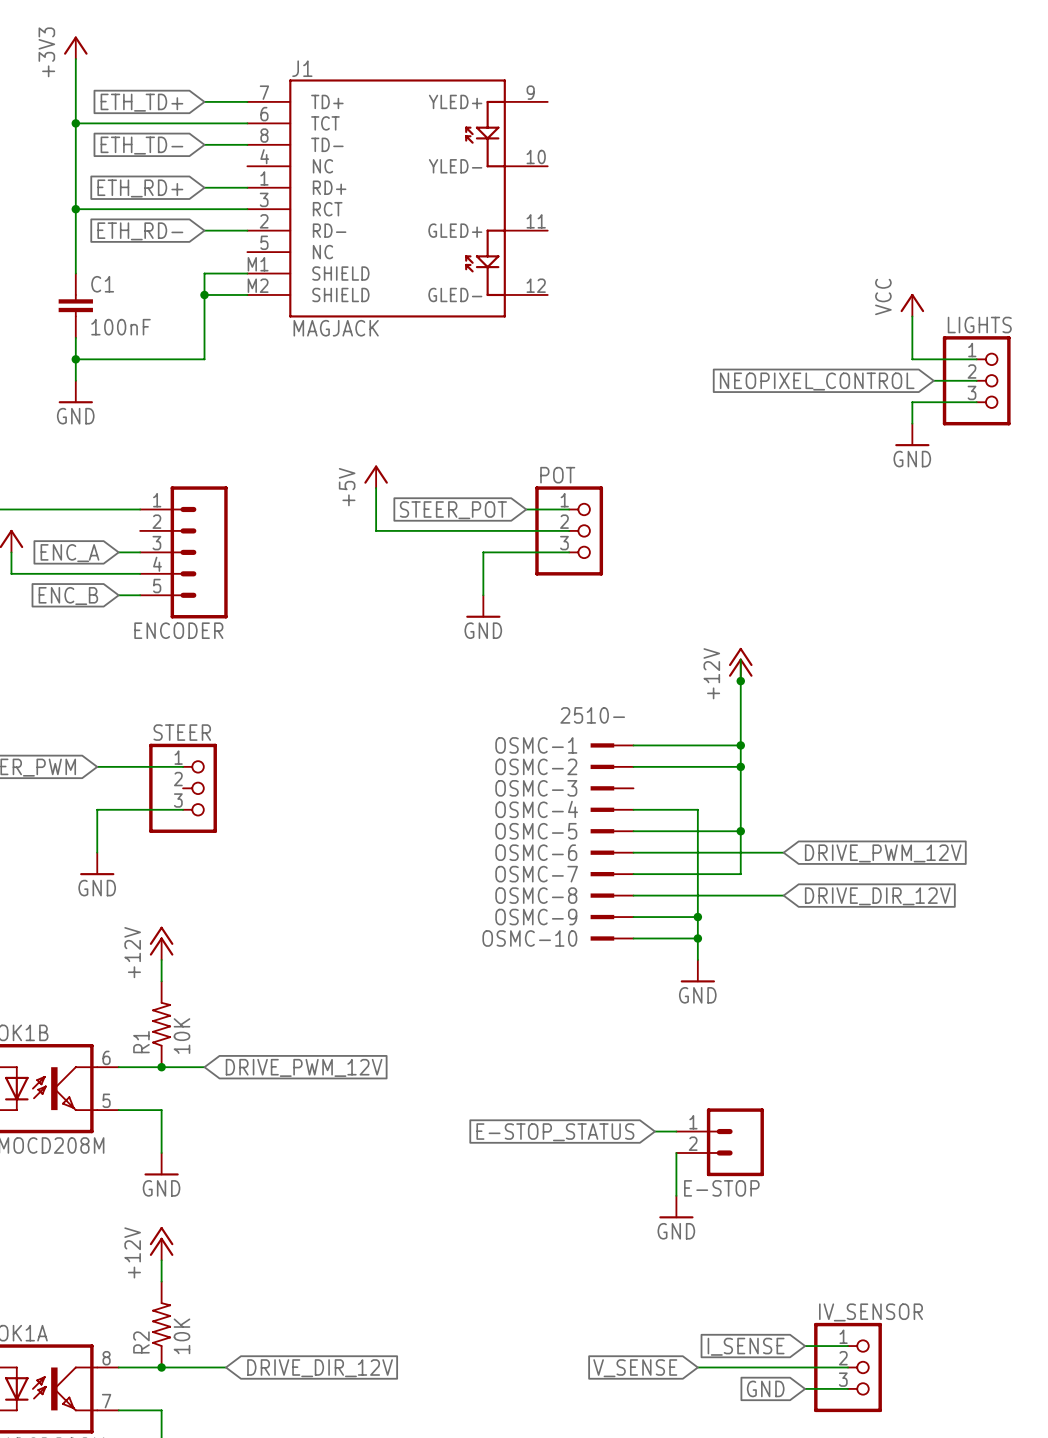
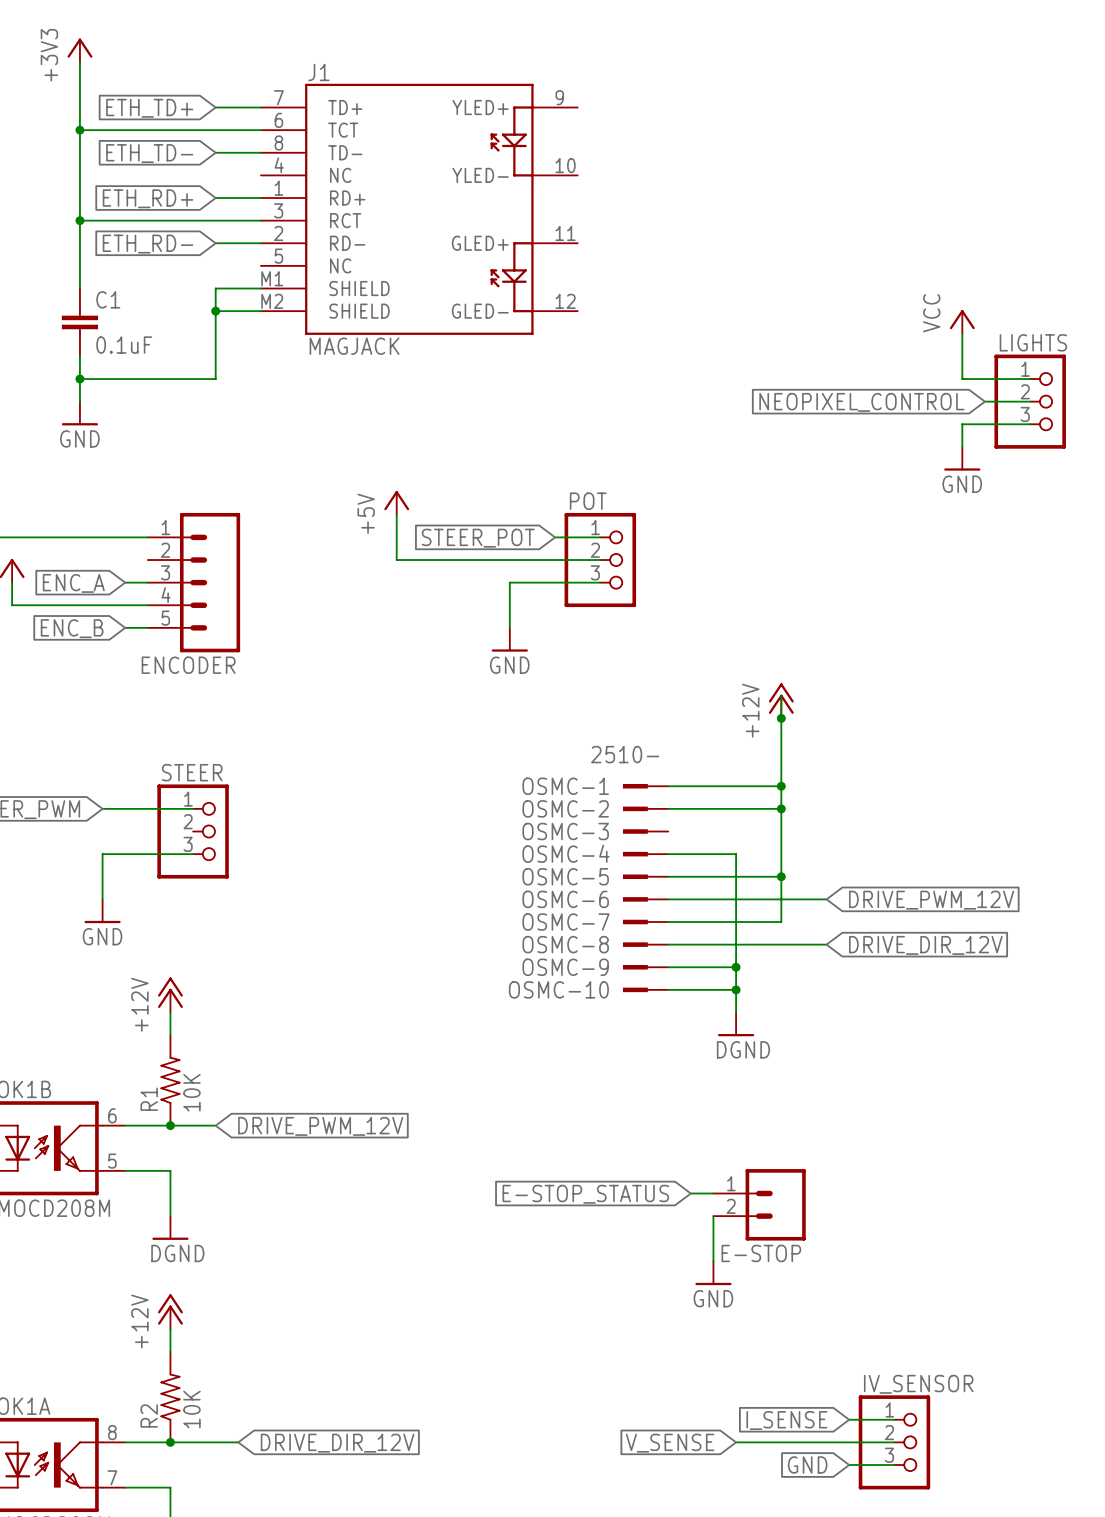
C1 value: 100nF (121, 327) -> 0.1uF (124, 345)
power symbol: GND (697, 971) -> DGND (736, 1024)
power symbol: GND (161, 1164) -> DGND (170, 1228)

